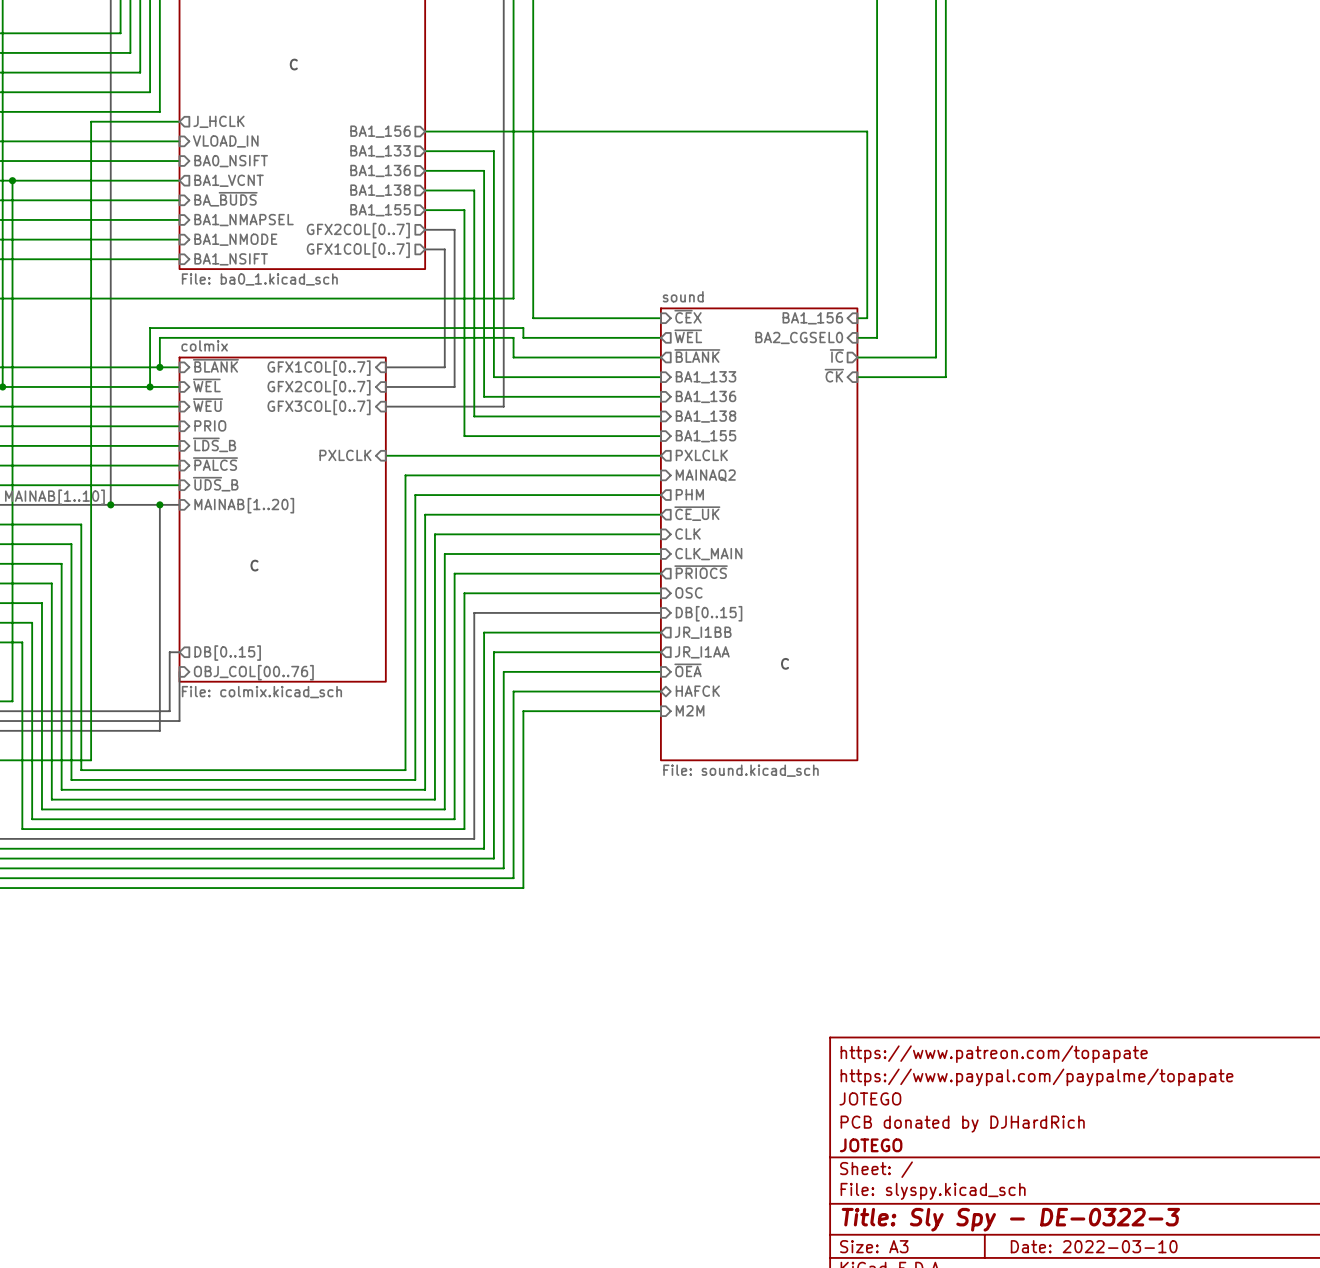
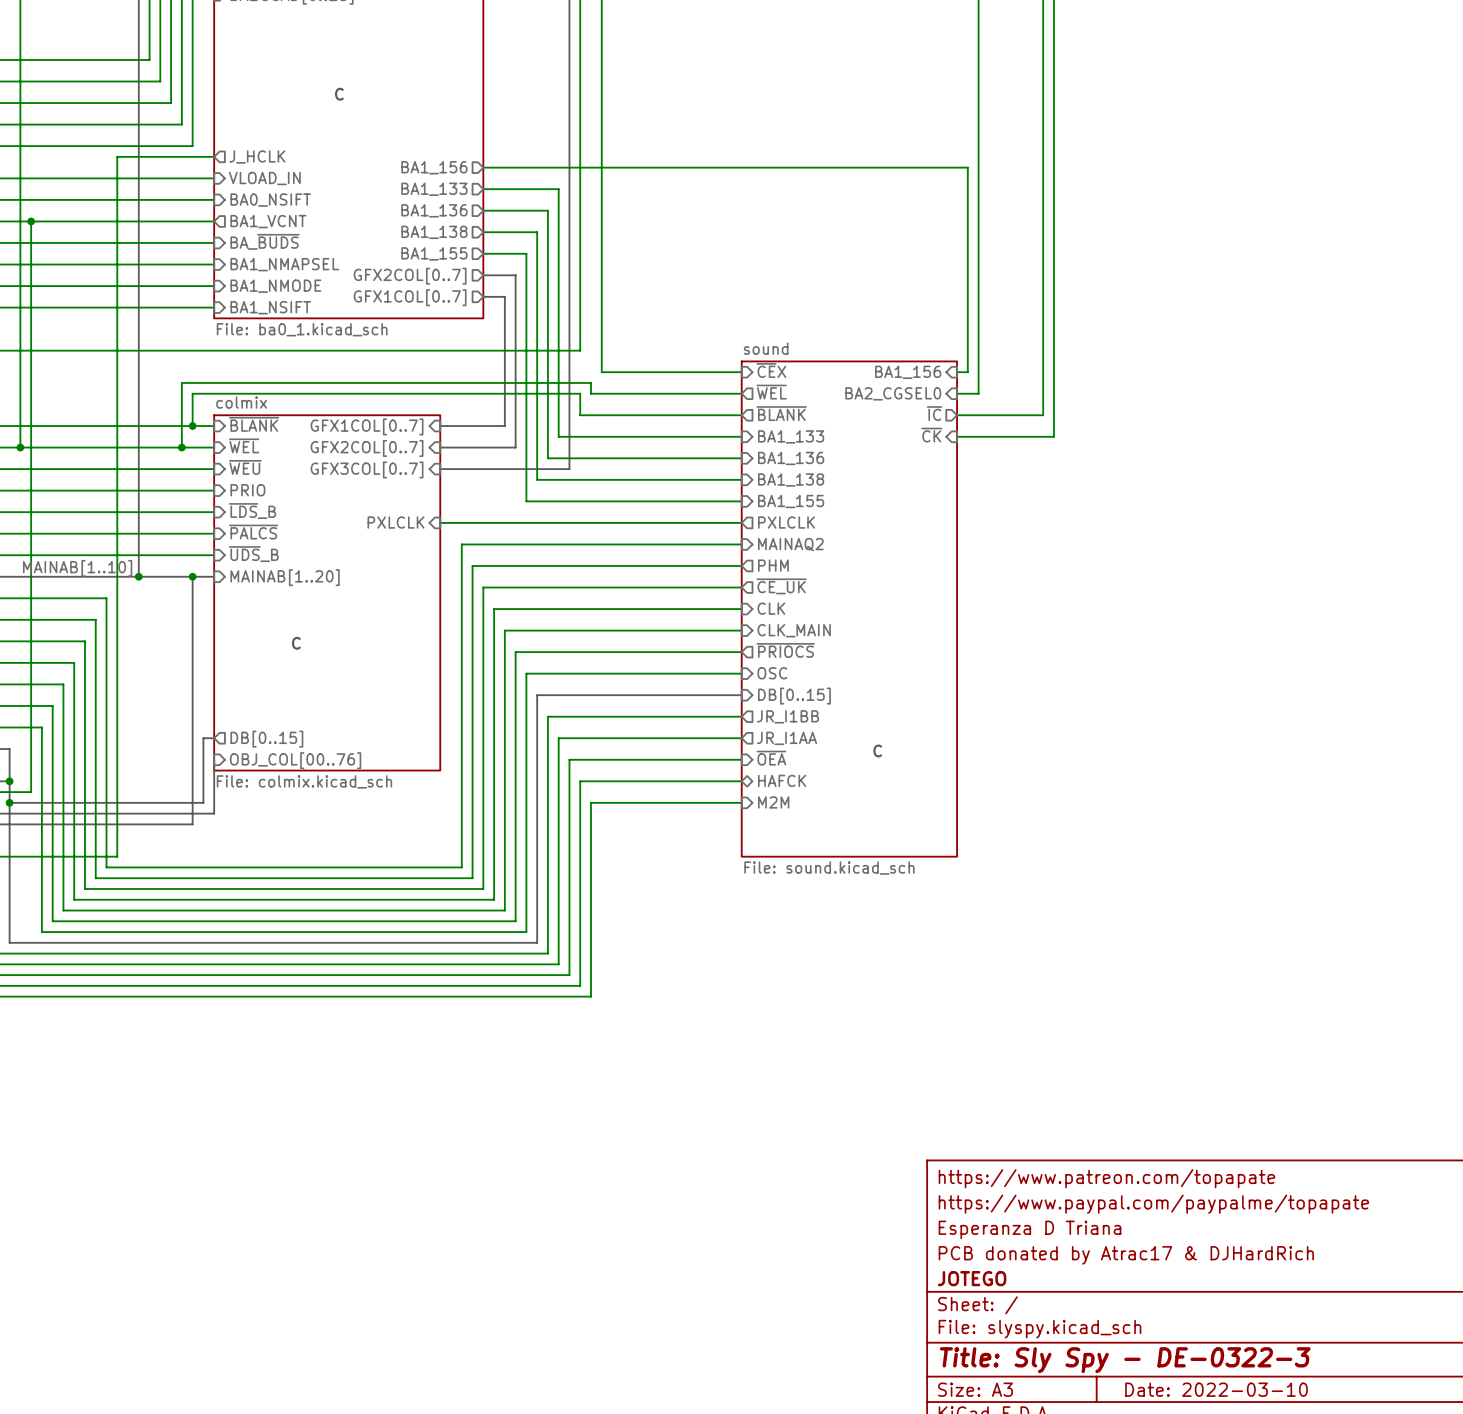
title block: JOTEGO (870, 1098) -> Esperanza D Triana (1030, 1229)
title block: PCB donated by DJHardRich (962, 1124) -> PCB donated by Atrac17 & DJHardRich (1126, 1255)

